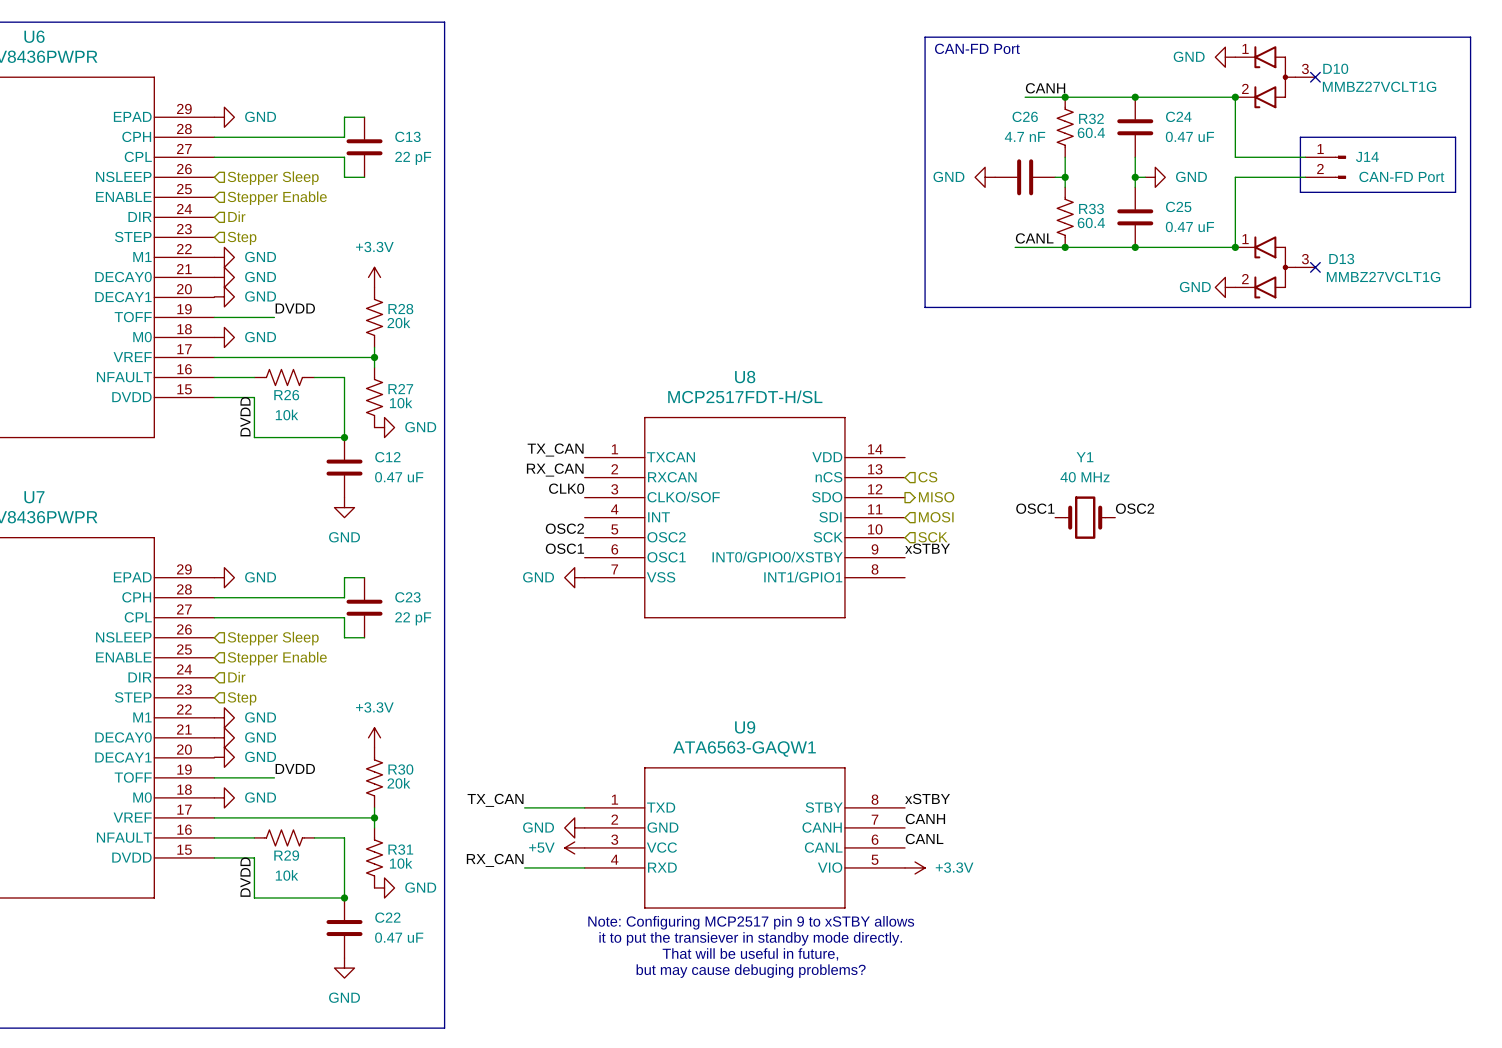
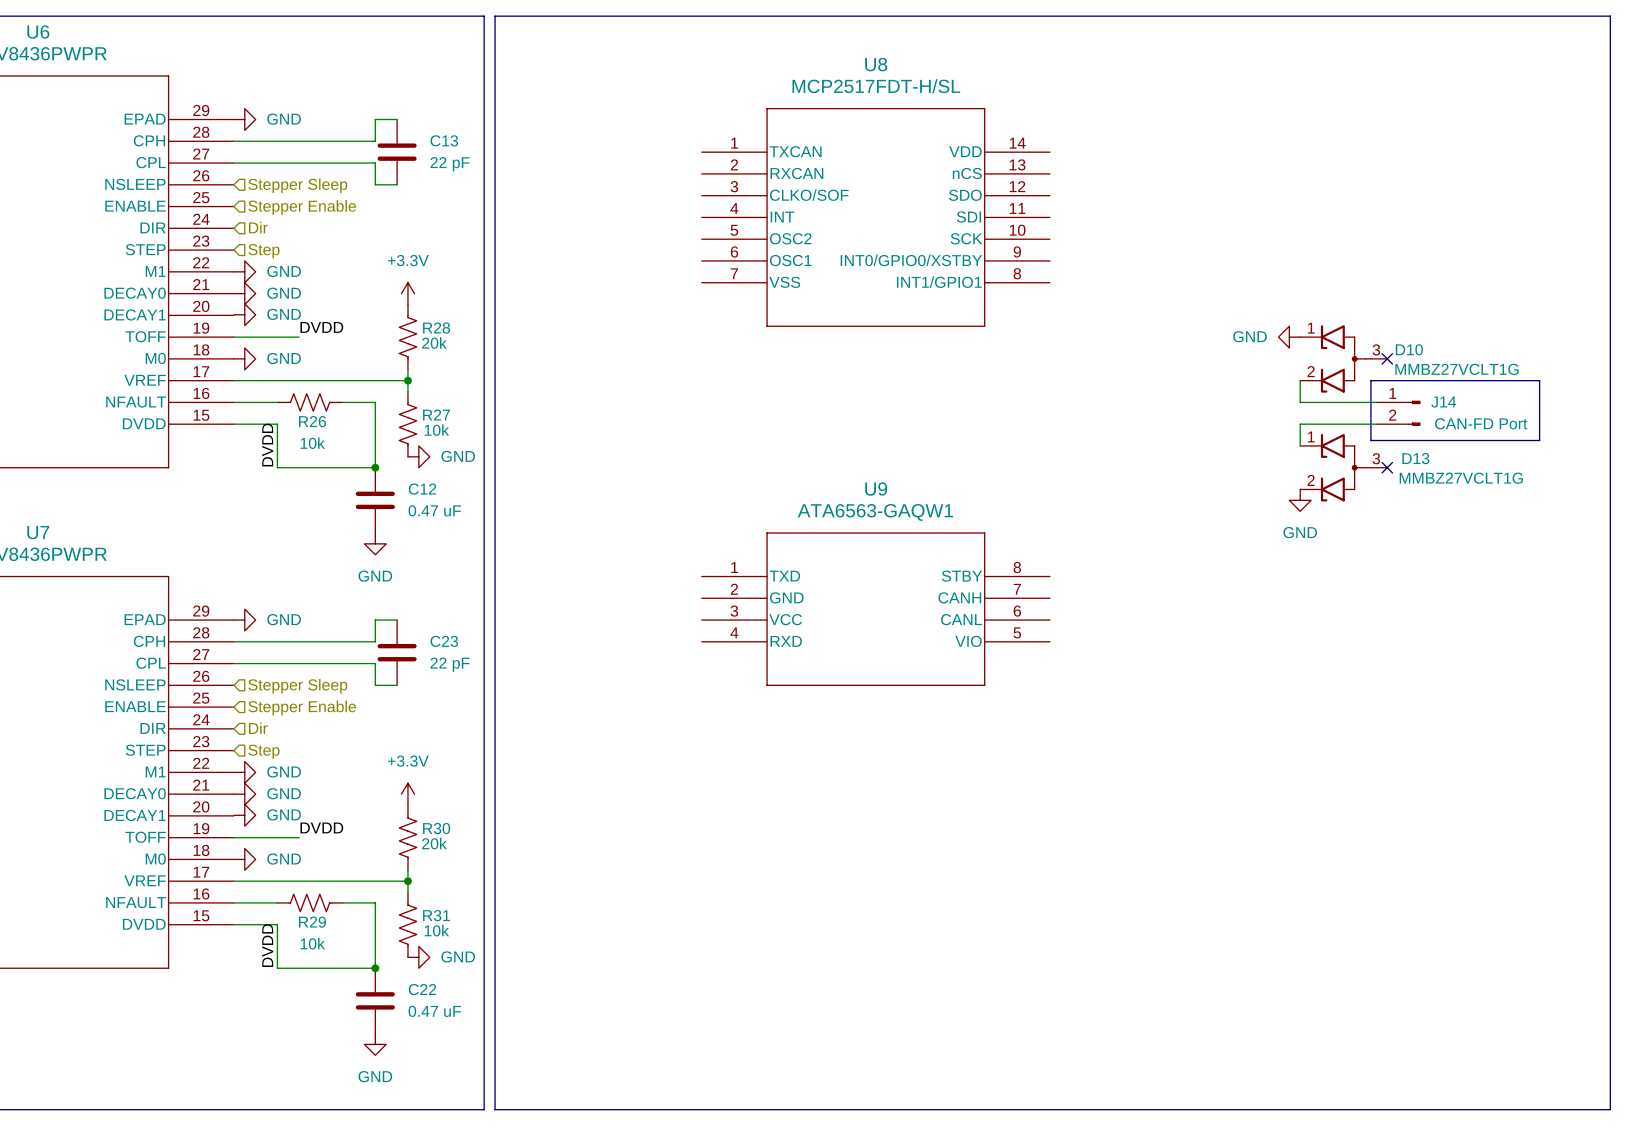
line: none -> (495, 16) (1610, 16) (1610, 1109) (495, 1109) (495, 16)
line: (925, 37) (1470, 37) (1470, 307) (925, 307) (925, 37) -> none
text: CAN-FD Port (977, 48) -> none
power symbol: GND (1225, 57) -> none
D10 position: (1275, 77) -> (1343, 358)
no-connect mark: (1315, 77) -> none
label: CANH (1045, 88) -> none
wire: (1025, 97) (1235, 97) (1235, 157) (1305, 157) -> none
junction: (1065, 97) -> none
junction: (1135, 97) -> none
junction: (1235, 97) -> none
R32: 60.4 (1065, 127) -> none
C24: 0.47 uF (1135, 127) -> none
line: (1300, 137) (1455, 137) (1455, 192) (1300, 192) (1300, 137) -> none
wire: (1065, 157) (1065, 187) -> none
wire: (1135, 157) (1135, 187) -> none
J14 position: (1325, 167) -> (1398, 413)
power symbol: GND (985, 177) -> none
C26: 4.7 nF (1025, 177) -> none
wire: (1055, 177) (1065, 177) -> none
junction: (1065, 177) -> none
wire: (1135, 177) (1145, 177) -> none
junction: (1135, 177) -> none
power symbol: GND (1155, 177) -> none
wire: (1305, 177) (1235, 177) (1235, 247) (1015, 247) -> none
R33: 60.4 (1065, 217) -> none
C25: 0.47 uF (1135, 217) -> none
label: CANL (1034, 238) -> none
junction: (1065, 247) -> none
junction: (1135, 247) -> none
junction: (1235, 247) -> none
D13 position: (1275, 267) -> (1343, 467)
no-connect mark: (1315, 267) -> none
power symbol text position: GND (1195, 287) -> GND (1250, 336)
power symbol position: GND (1225, 287) -> GND (1289, 337)
no-connect mark: none -> (1387, 358)
wire: none -> (1300, 380) (1300, 402) (1376, 402)
line: none -> (1370, 380) (1539, 380) (1539, 440) (1370, 440) (1370, 380)
wire: none -> (1376, 424) (1300, 424) (1300, 445)
no-connect mark: none -> (1387, 467)
label: TX_CAN (555, 450) -> none
power symbol: none -> GND (1300, 500)
label: RX_CAN (555, 470) -> none
hierarchical label: CS (927, 477) -> none
label: CLK0 (566, 488) -> none
hierarchical label: MISO (936, 497) -> none
label: OSC1 (1035, 508) -> none
label: OSC2 (1135, 508) -> none
U8 position: (744, 517) -> (875, 217)
hierarchical label: MOSI (936, 517) -> none
Y1: 40 MHz (1085, 517) -> none
label: OSC2 (564, 528) -> none
hierarchical label: SCK (932, 537) -> none
label: OSC1 (564, 548) -> none
label: xSTBY (927, 548) -> none
power symbol: GND (574, 577) -> none
label: xSTBY (927, 798) -> none
label: TX_CAN (495, 800) -> none
wire: (524, 807) (584, 807) -> none
label: CANH (925, 818) -> none
power symbol: GND (574, 827) -> none
U9 position: (744, 837) -> (875, 609)
label: CANL (924, 839) -> none
power symbol: +5V (574, 847) -> none
label: RX_CAN (495, 860) -> none
wire: (524, 867) (584, 867) -> none
power symbol: +3.3V (915, 867) -> none
text: Note: Configuring MCP2517 pin 9 to xSTBY allows (751, 922) -> none
text: it to put the transiever in standby mode directly. (750, 938) -> none
text: That will be useful in future, (750, 954) -> none
text: but may cause debuging problems? (751, 971) -> none

